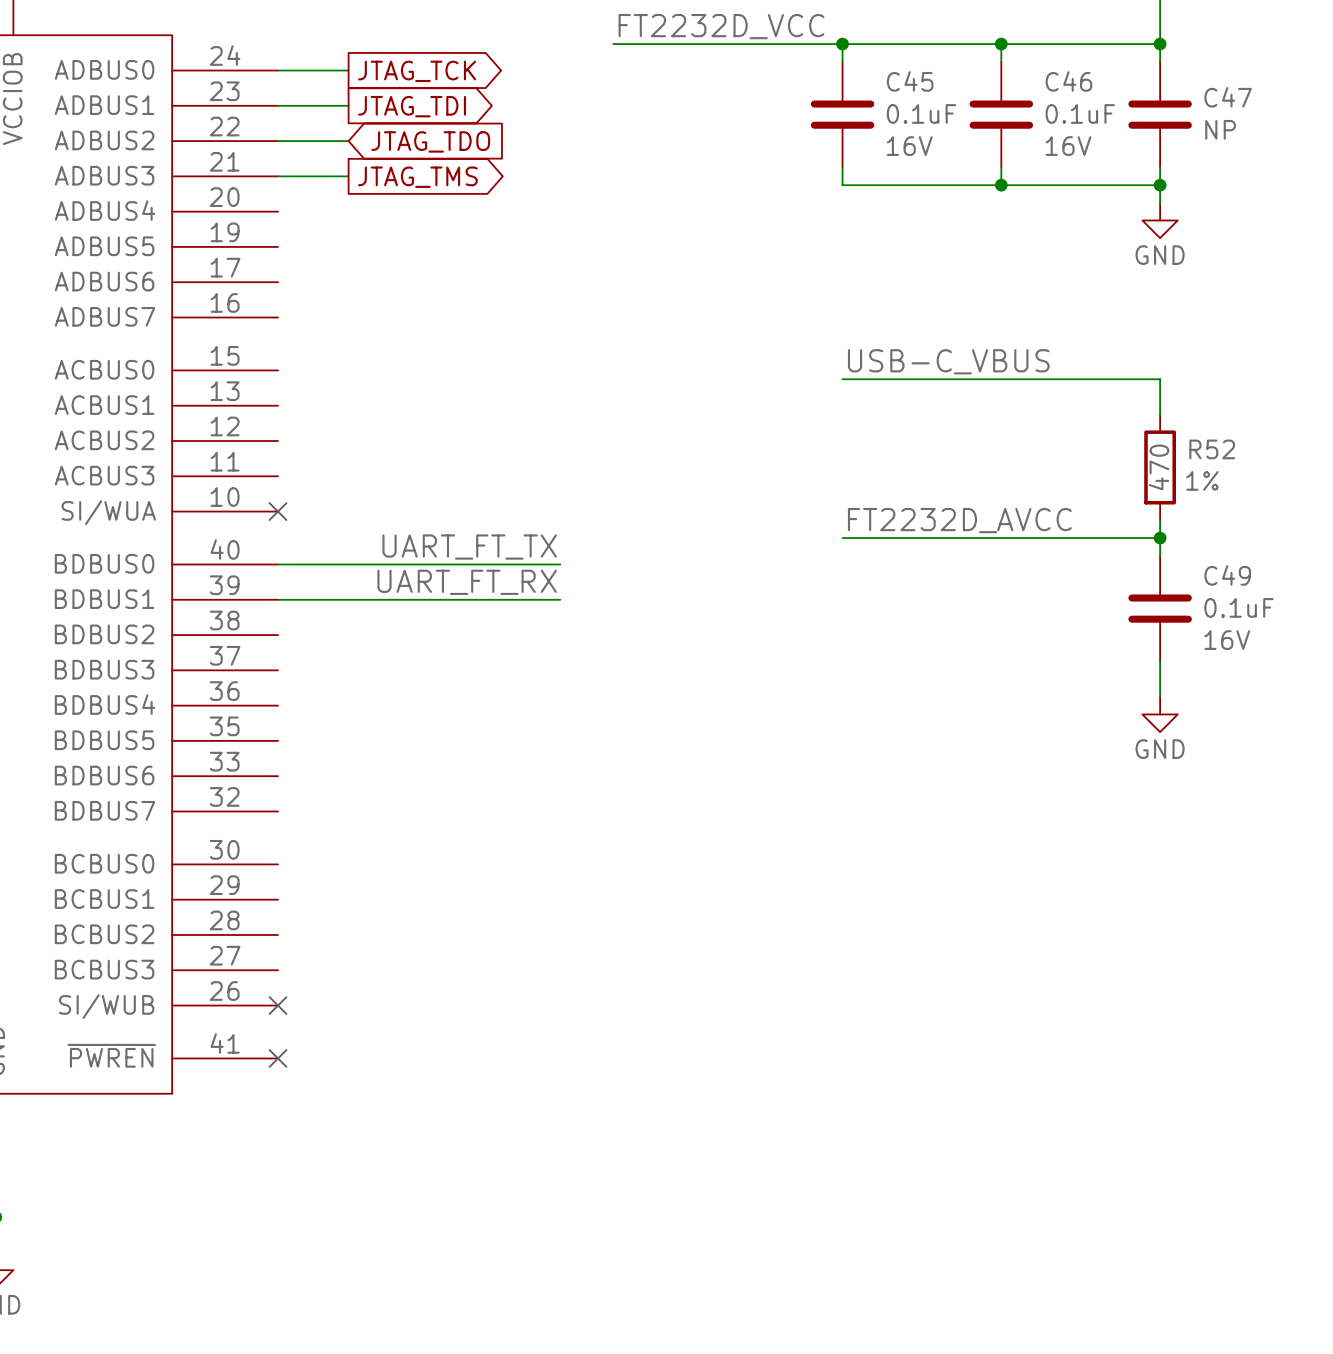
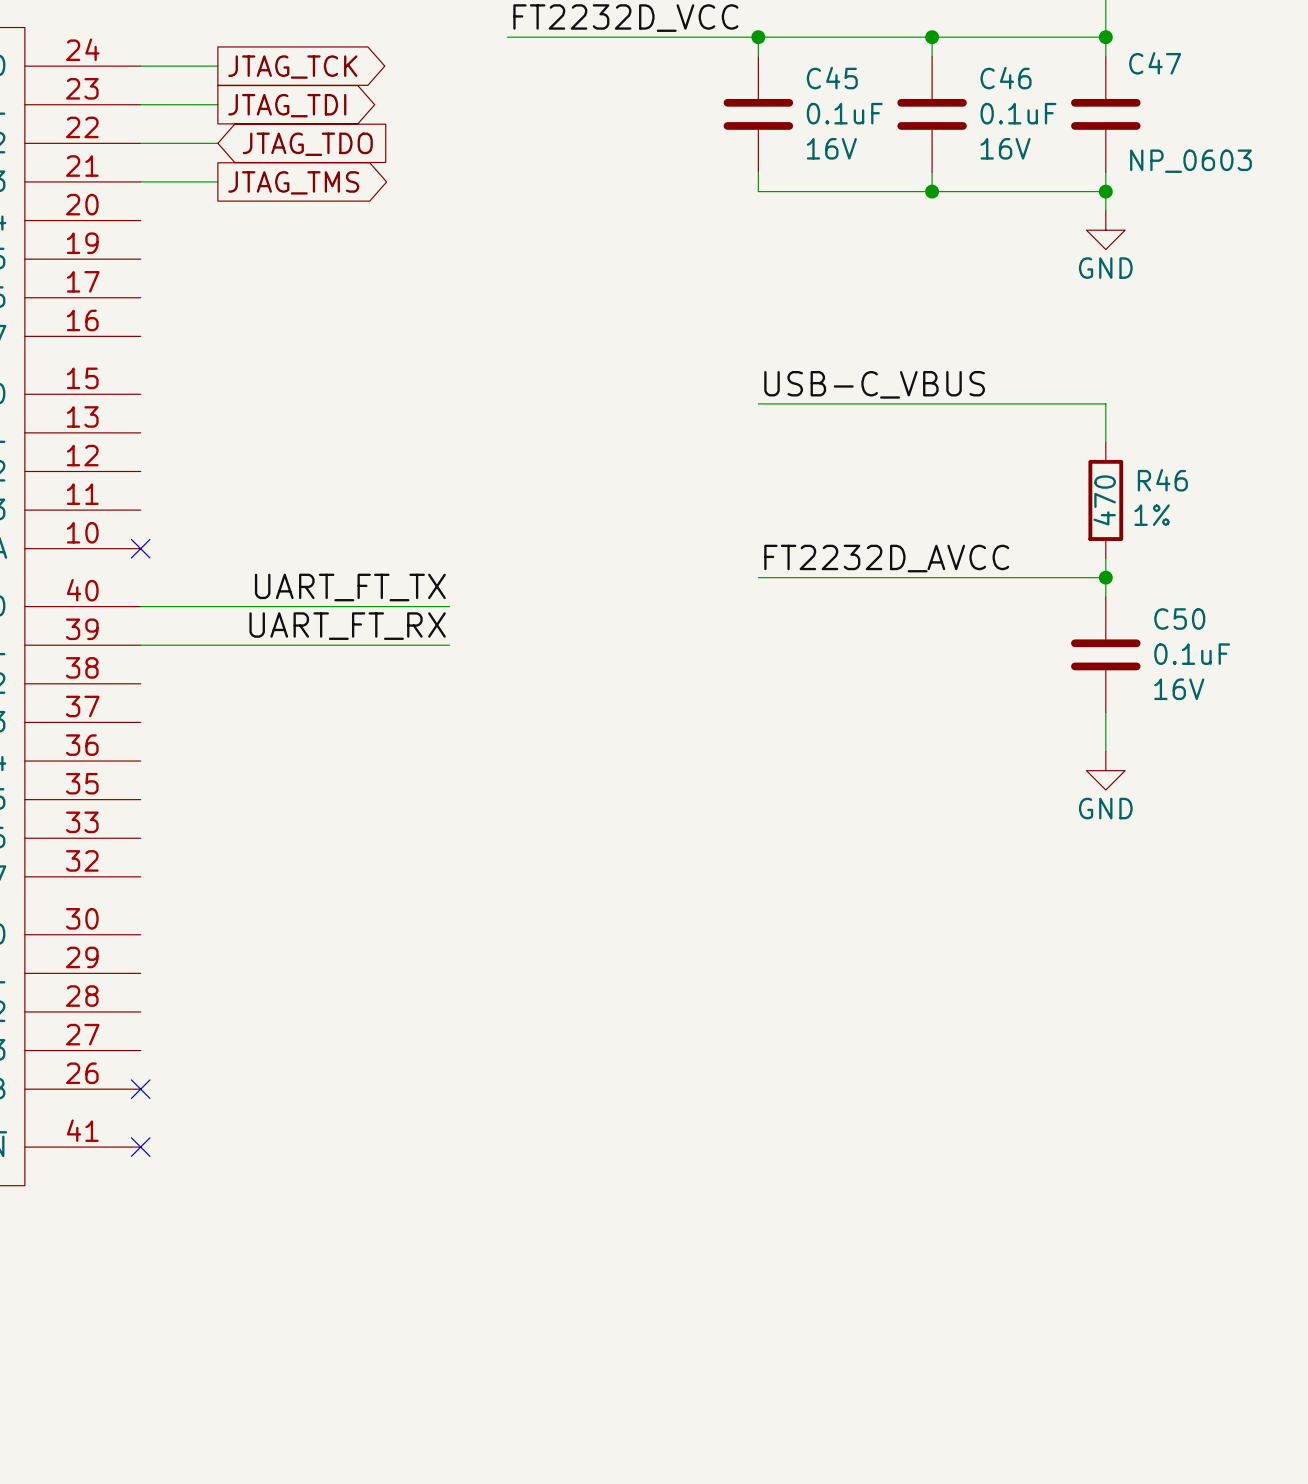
C47 name position: C47 (1228, 97) -> C47 (1155, 63)
C47 text: NP (1220, 129) -> NP_0603 (1190, 161)
R52 name: R52 (1212, 449) -> R46 (1162, 480)
C49 name: C49 (1227, 575) -> C50 (1179, 619)

